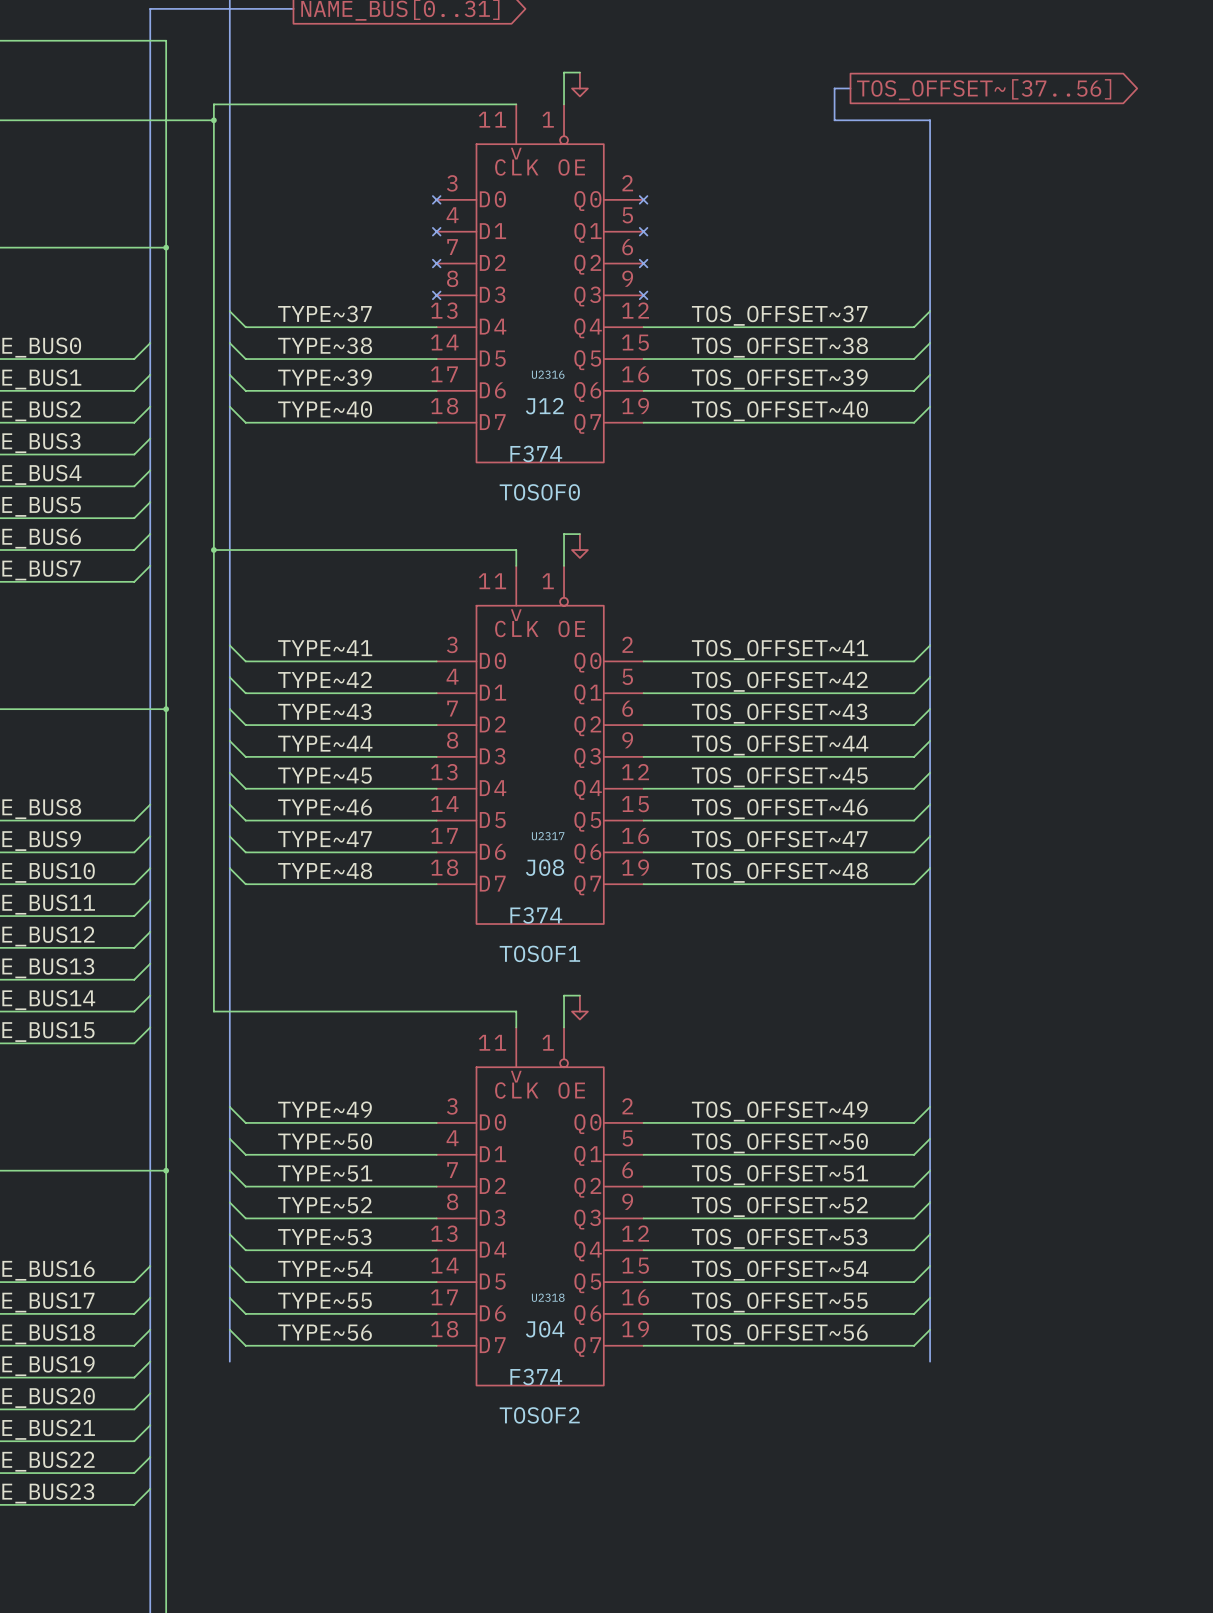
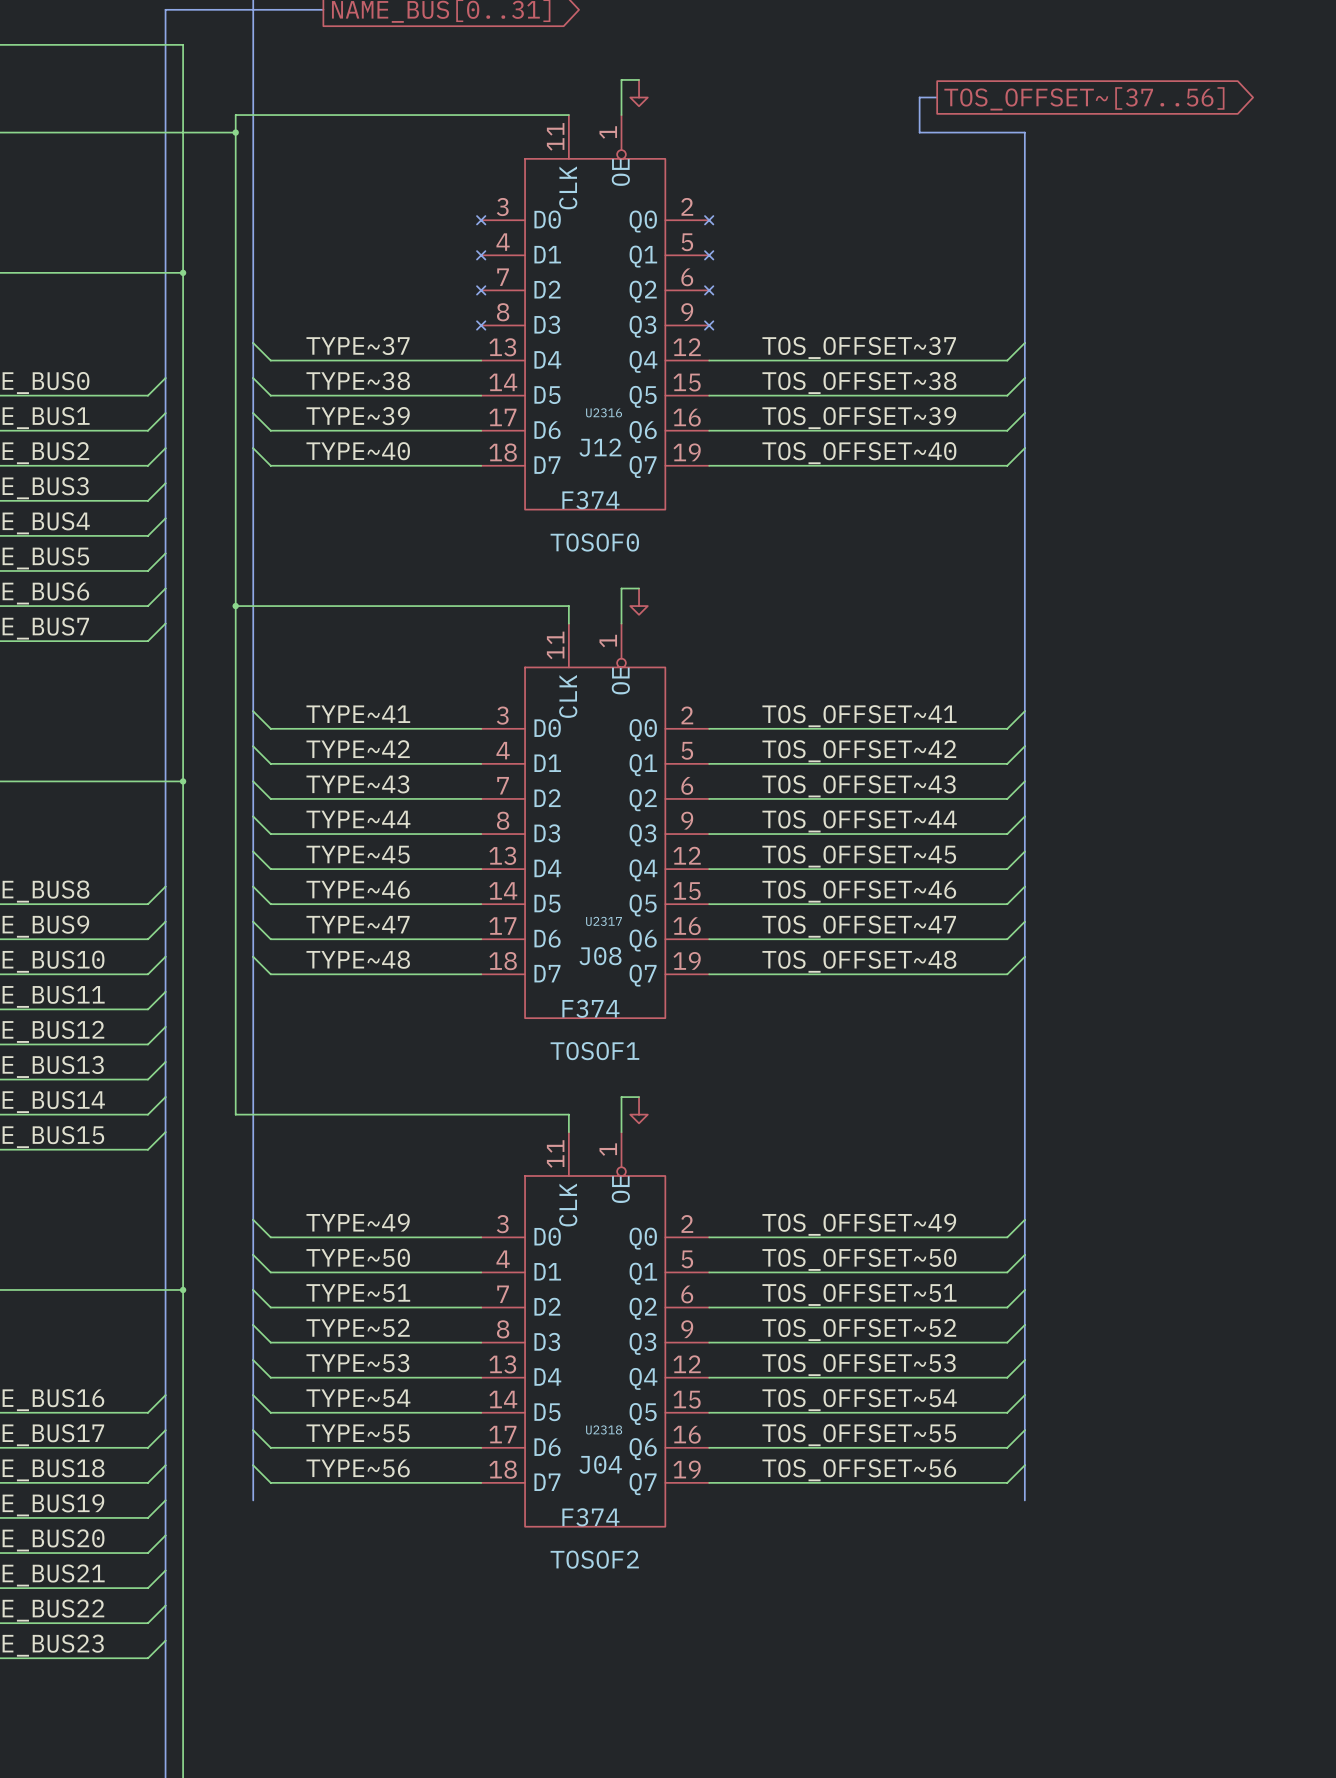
U2316 symbol: [436, 104, 644, 463] -> [481, 115, 710, 510]
U2317 symbol: [436, 565, 644, 925] -> [481, 623, 710, 1019]
U2318 symbol: [436, 1027, 644, 1386] -> [481, 1132, 710, 1527]

